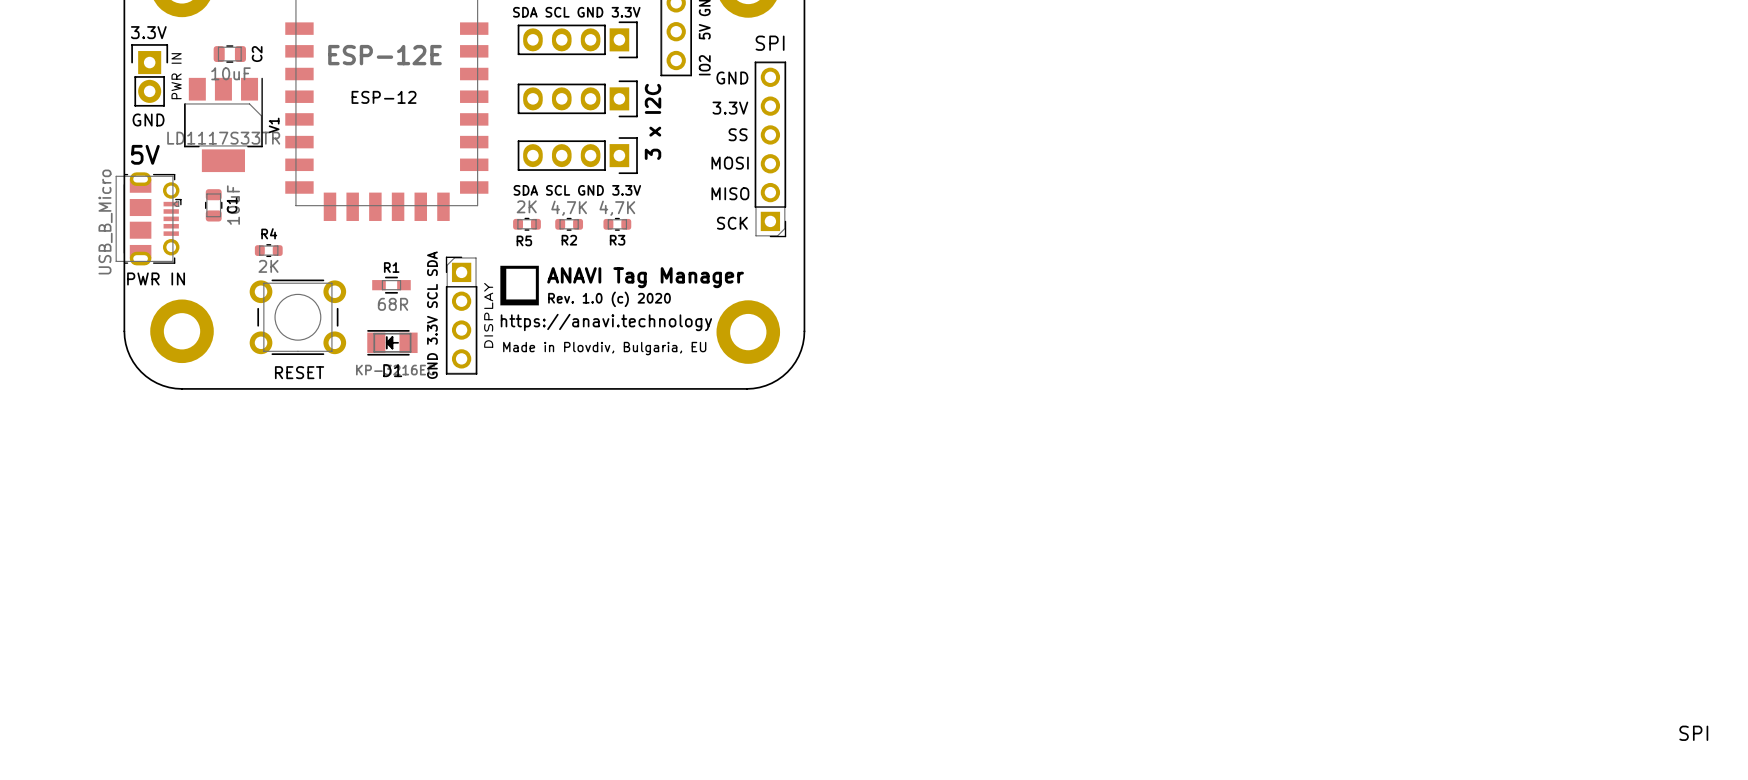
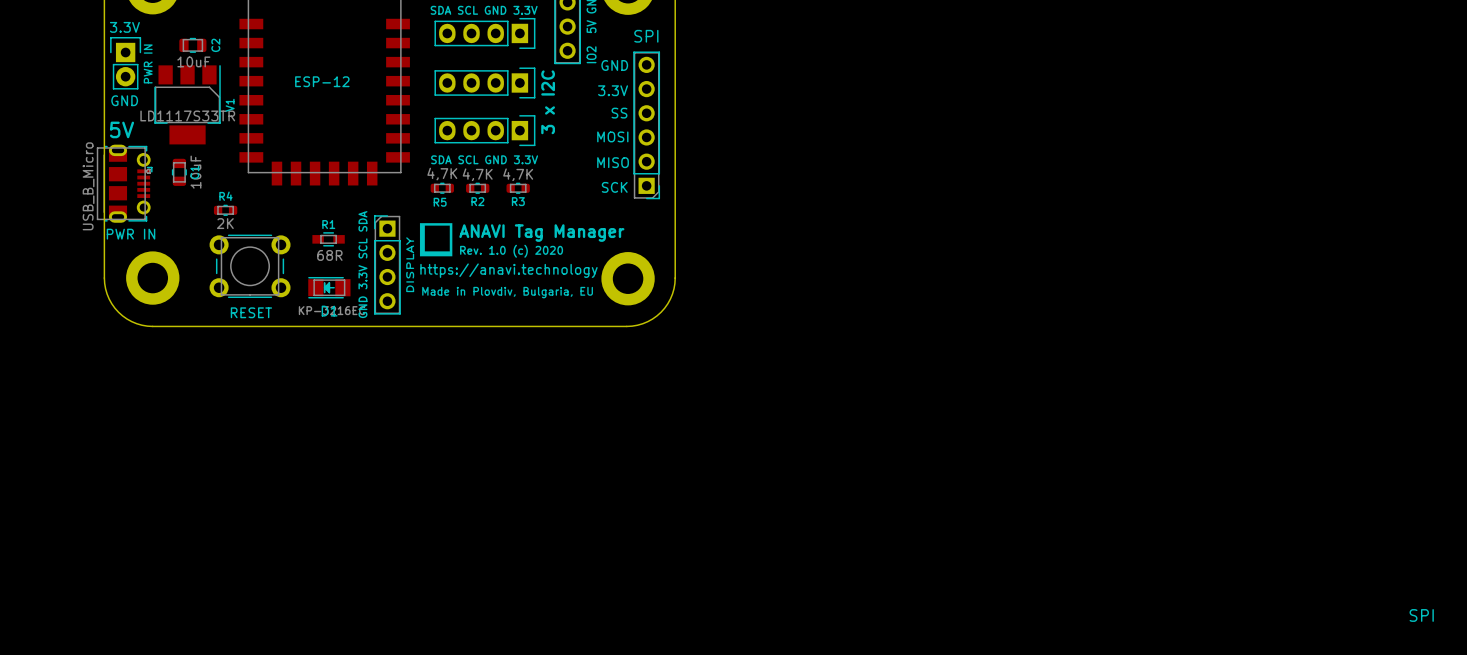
text: ESP-12E (384, 55) -> none
R5 value: 2K (526, 206) -> 4,7K (442, 174)

